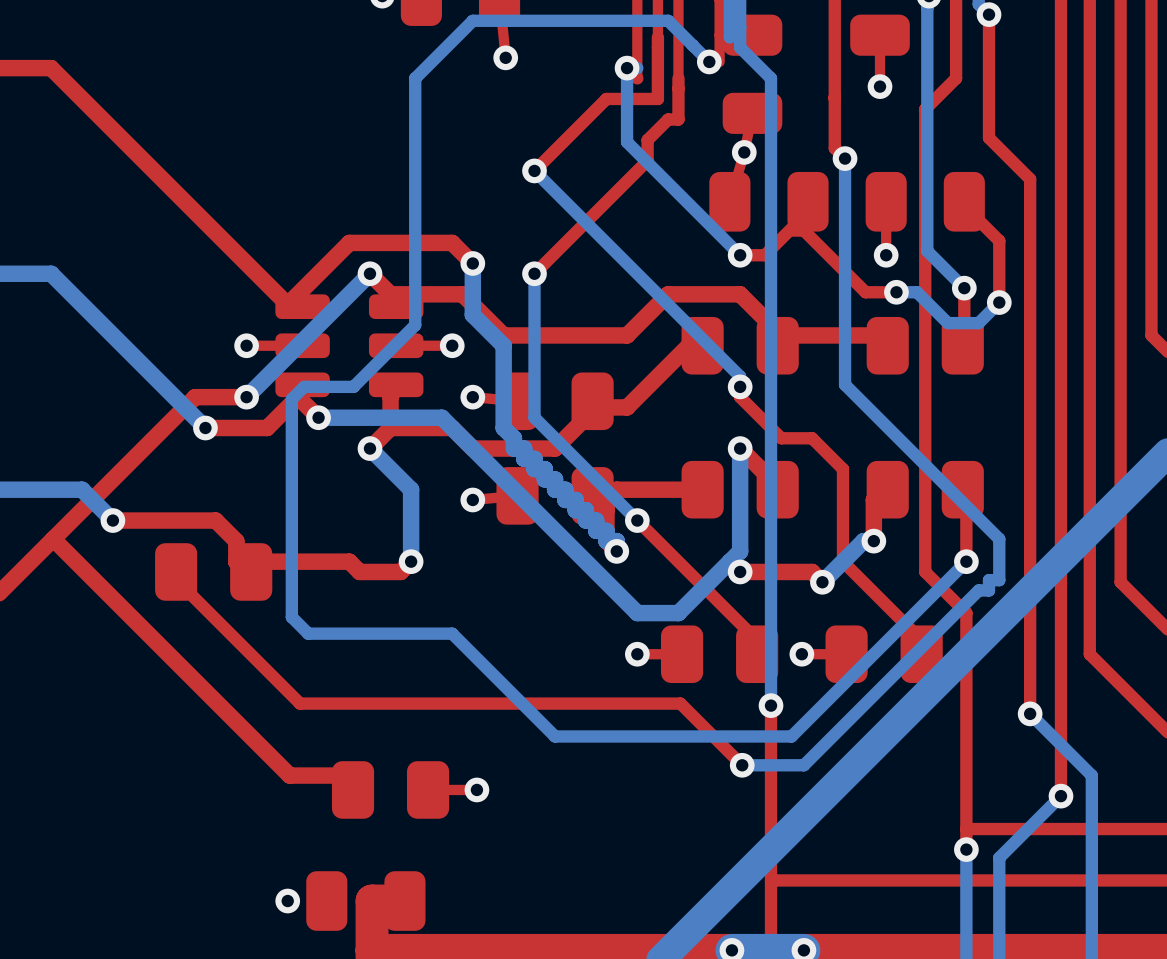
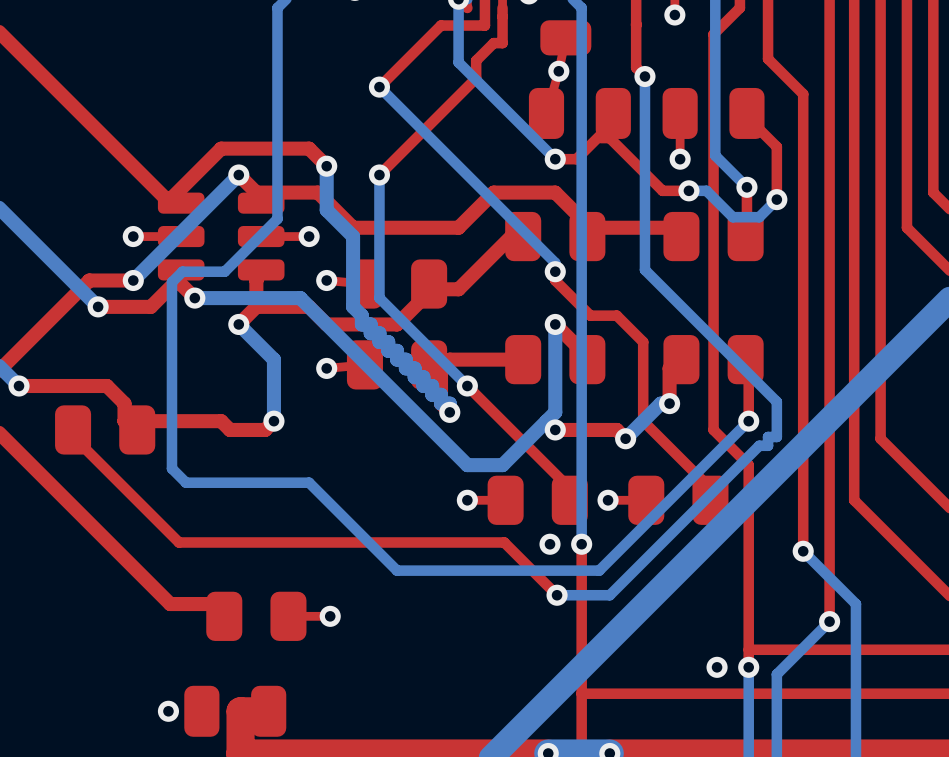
via: none -> (550, 544)
via: none -> (717, 667)

